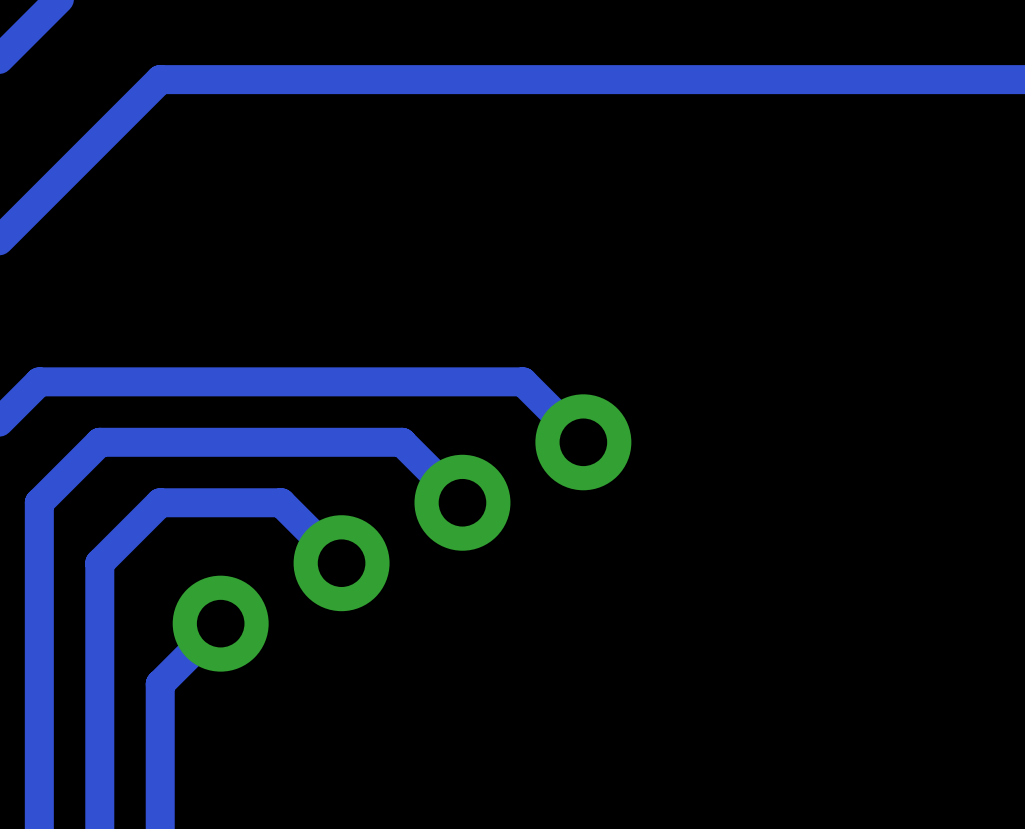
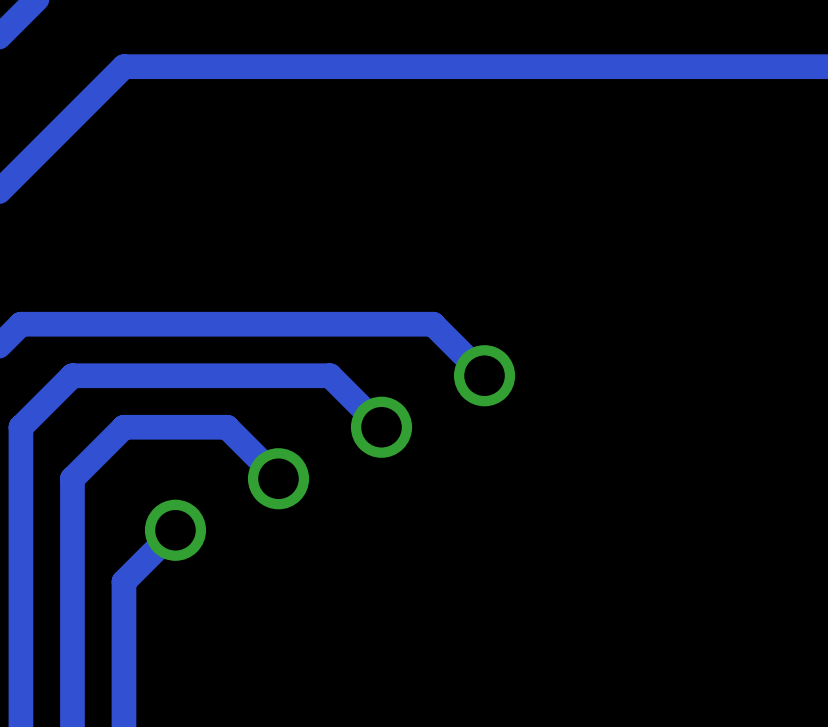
via size: [535, 394, 632, 491] -> [453, 345, 516, 407]
via size: [414, 454, 511, 551] -> [350, 396, 413, 458]
via size: [293, 515, 390, 612] -> [247, 448, 310, 510]
via size: [172, 575, 269, 672] -> [144, 499, 207, 561]

